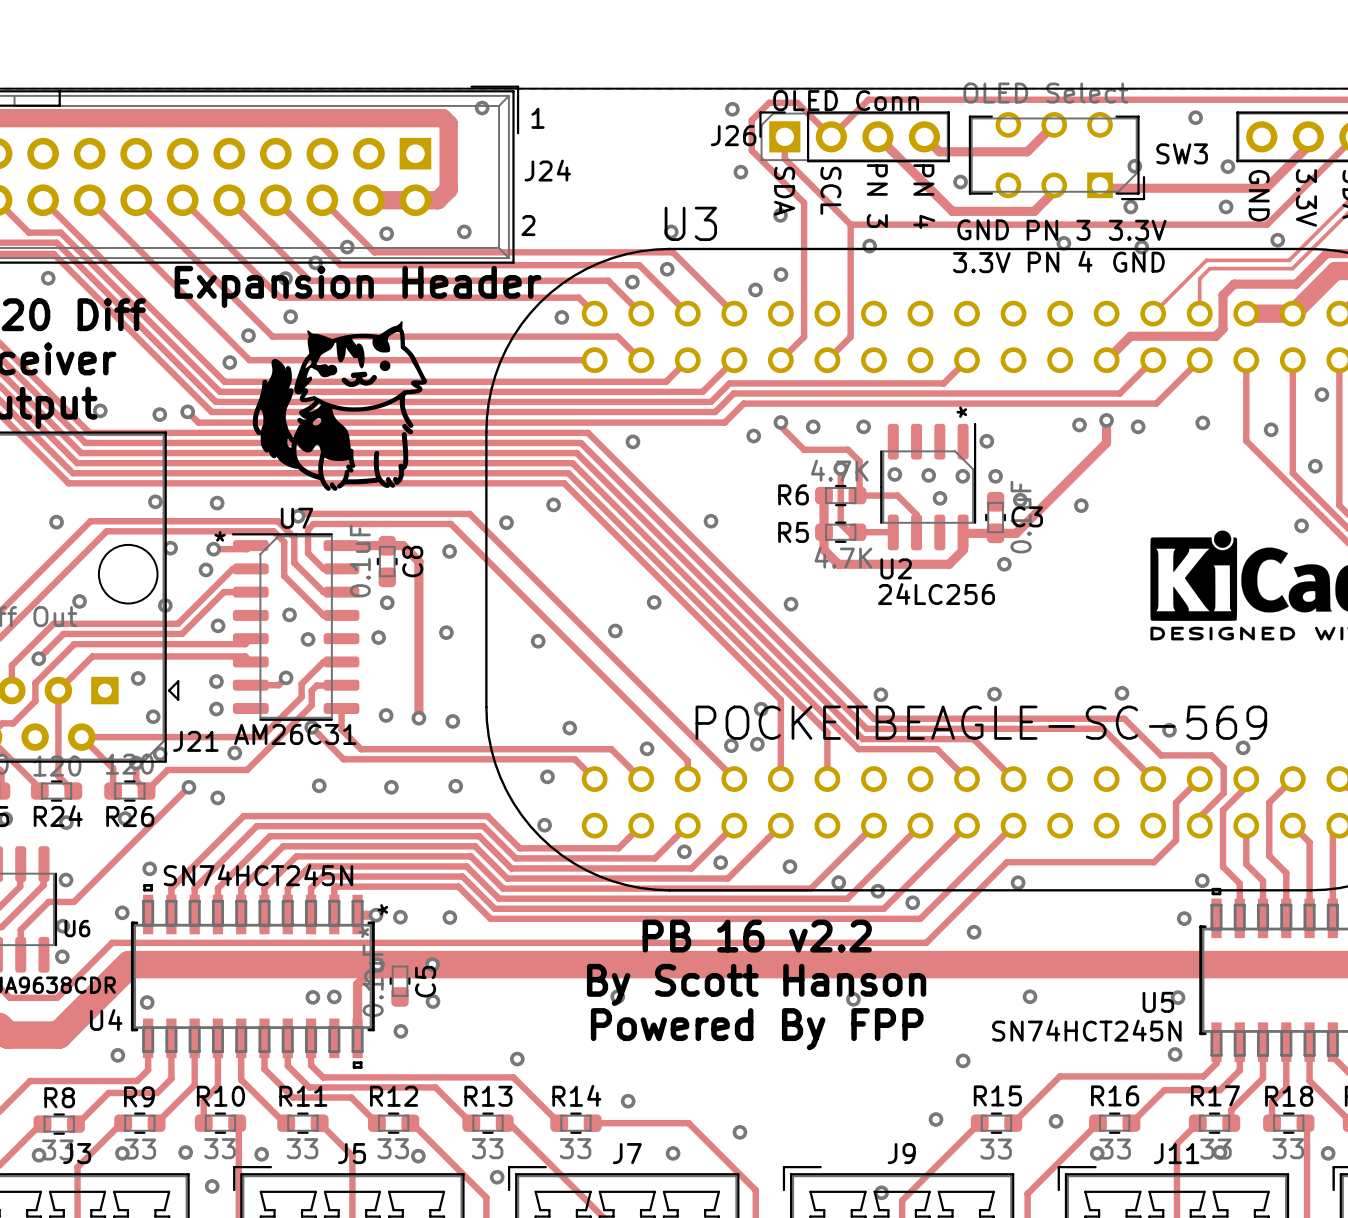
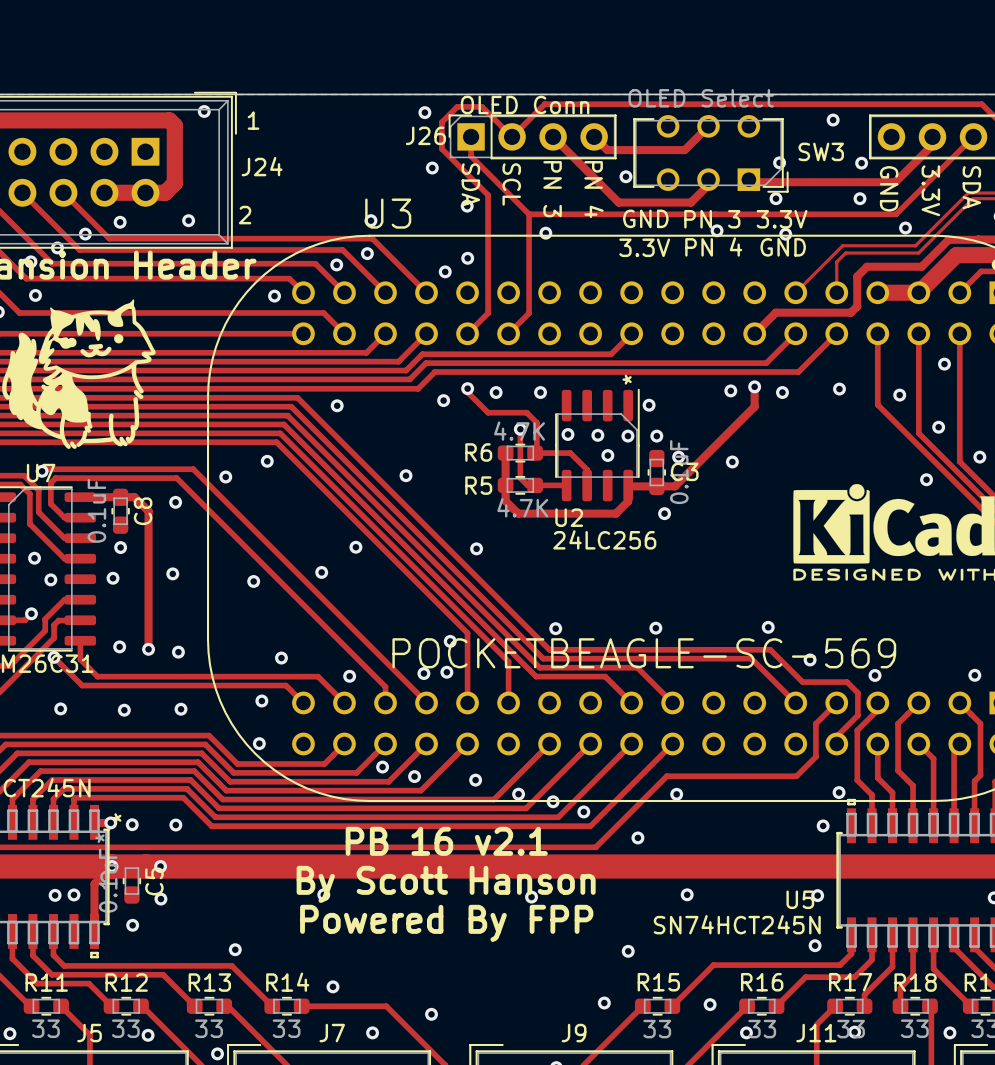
text: PB 16 v2.2 (757, 936) -> PB 16 v2.1 (446, 841)

